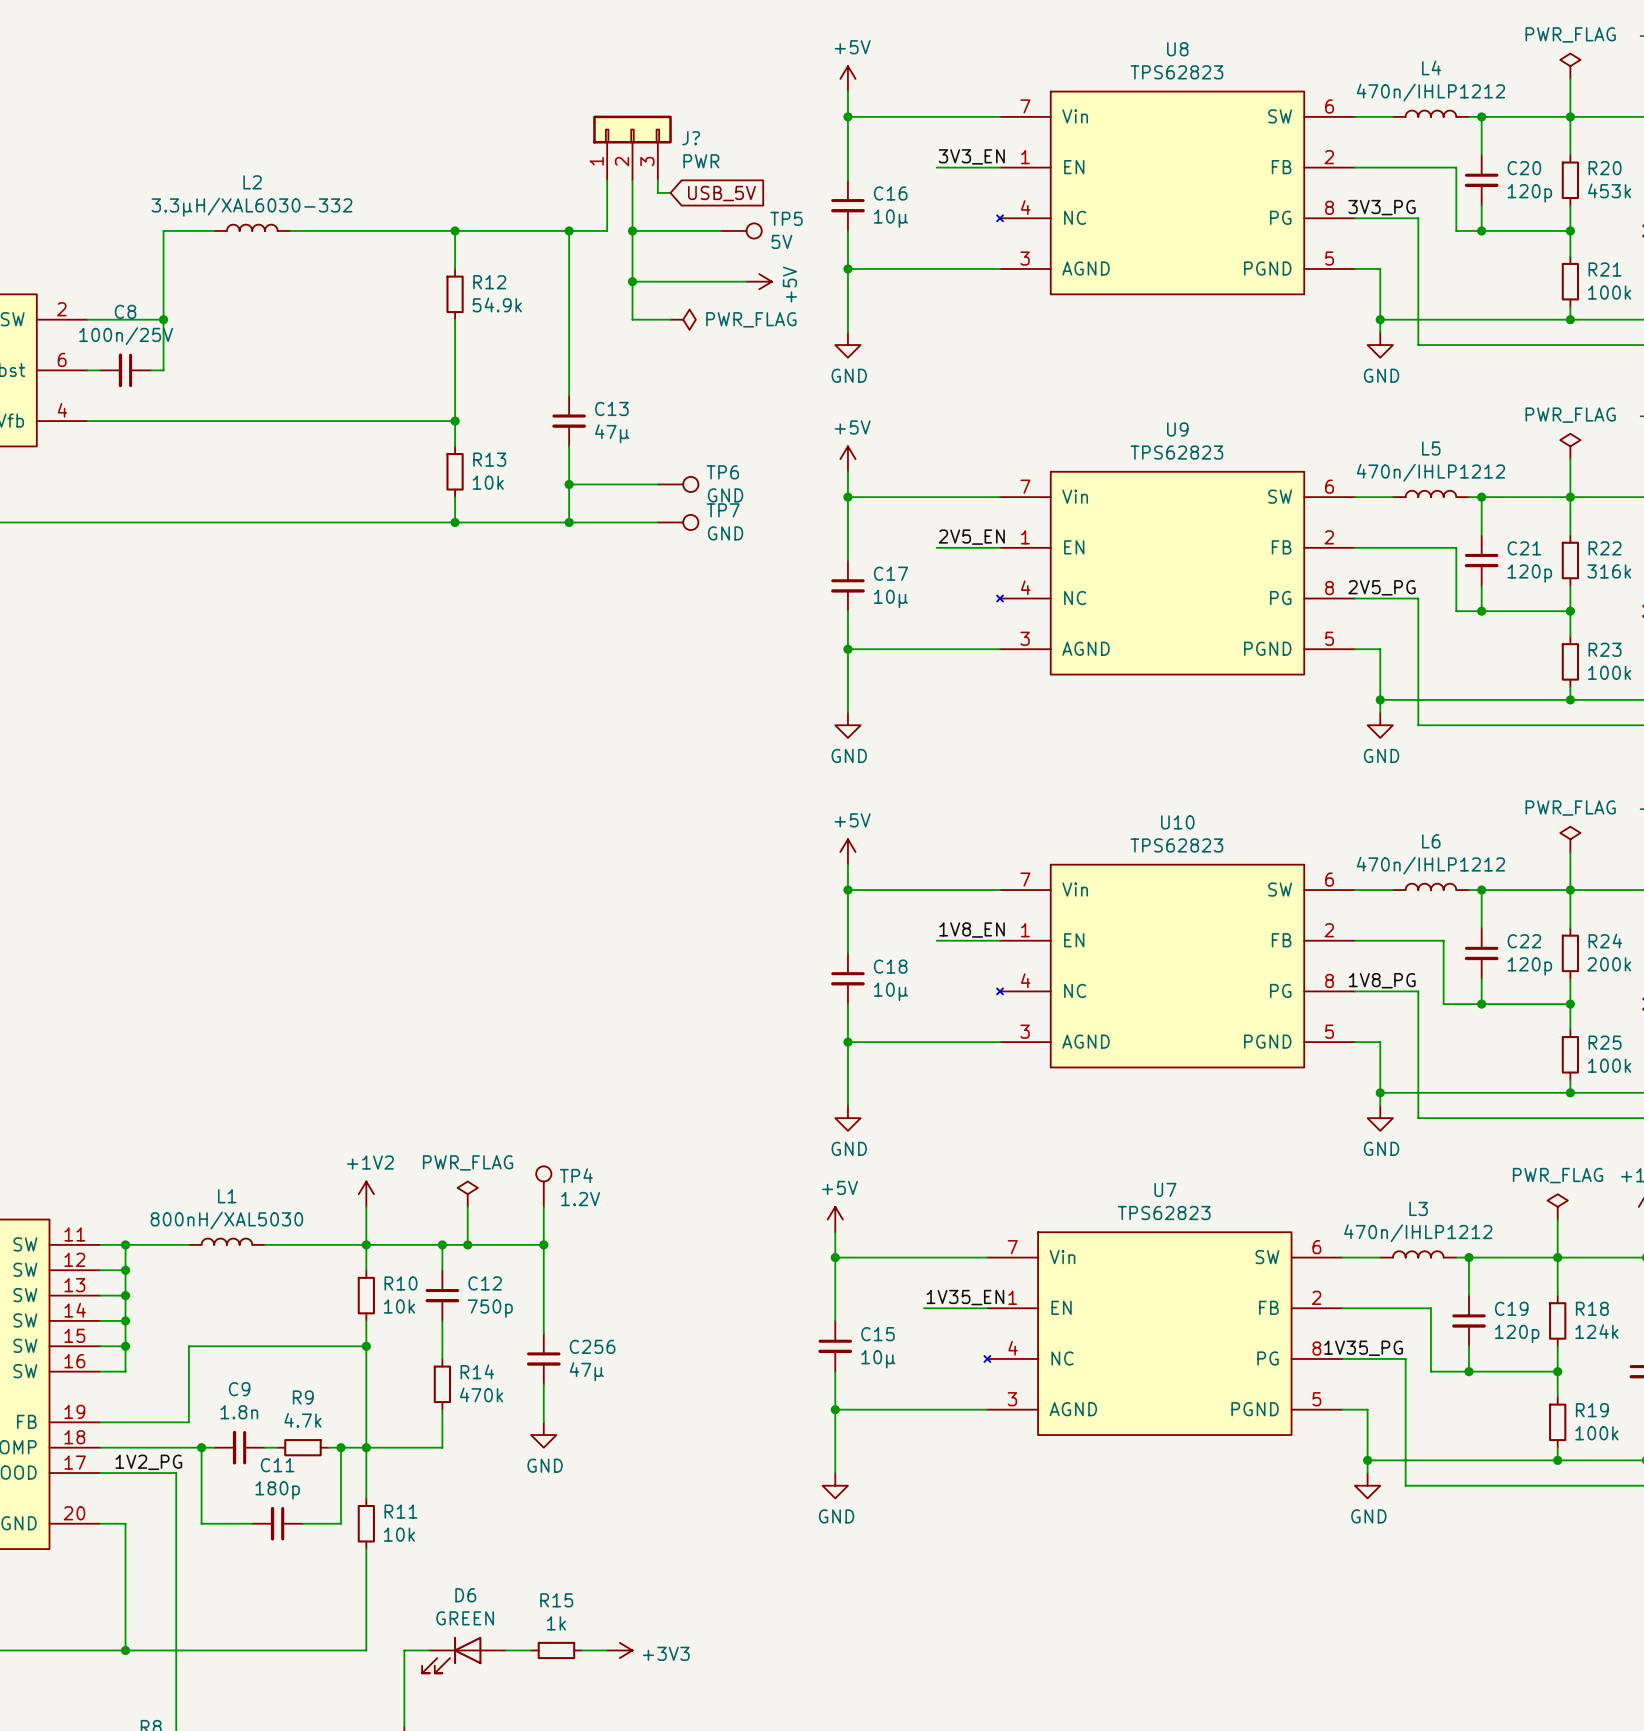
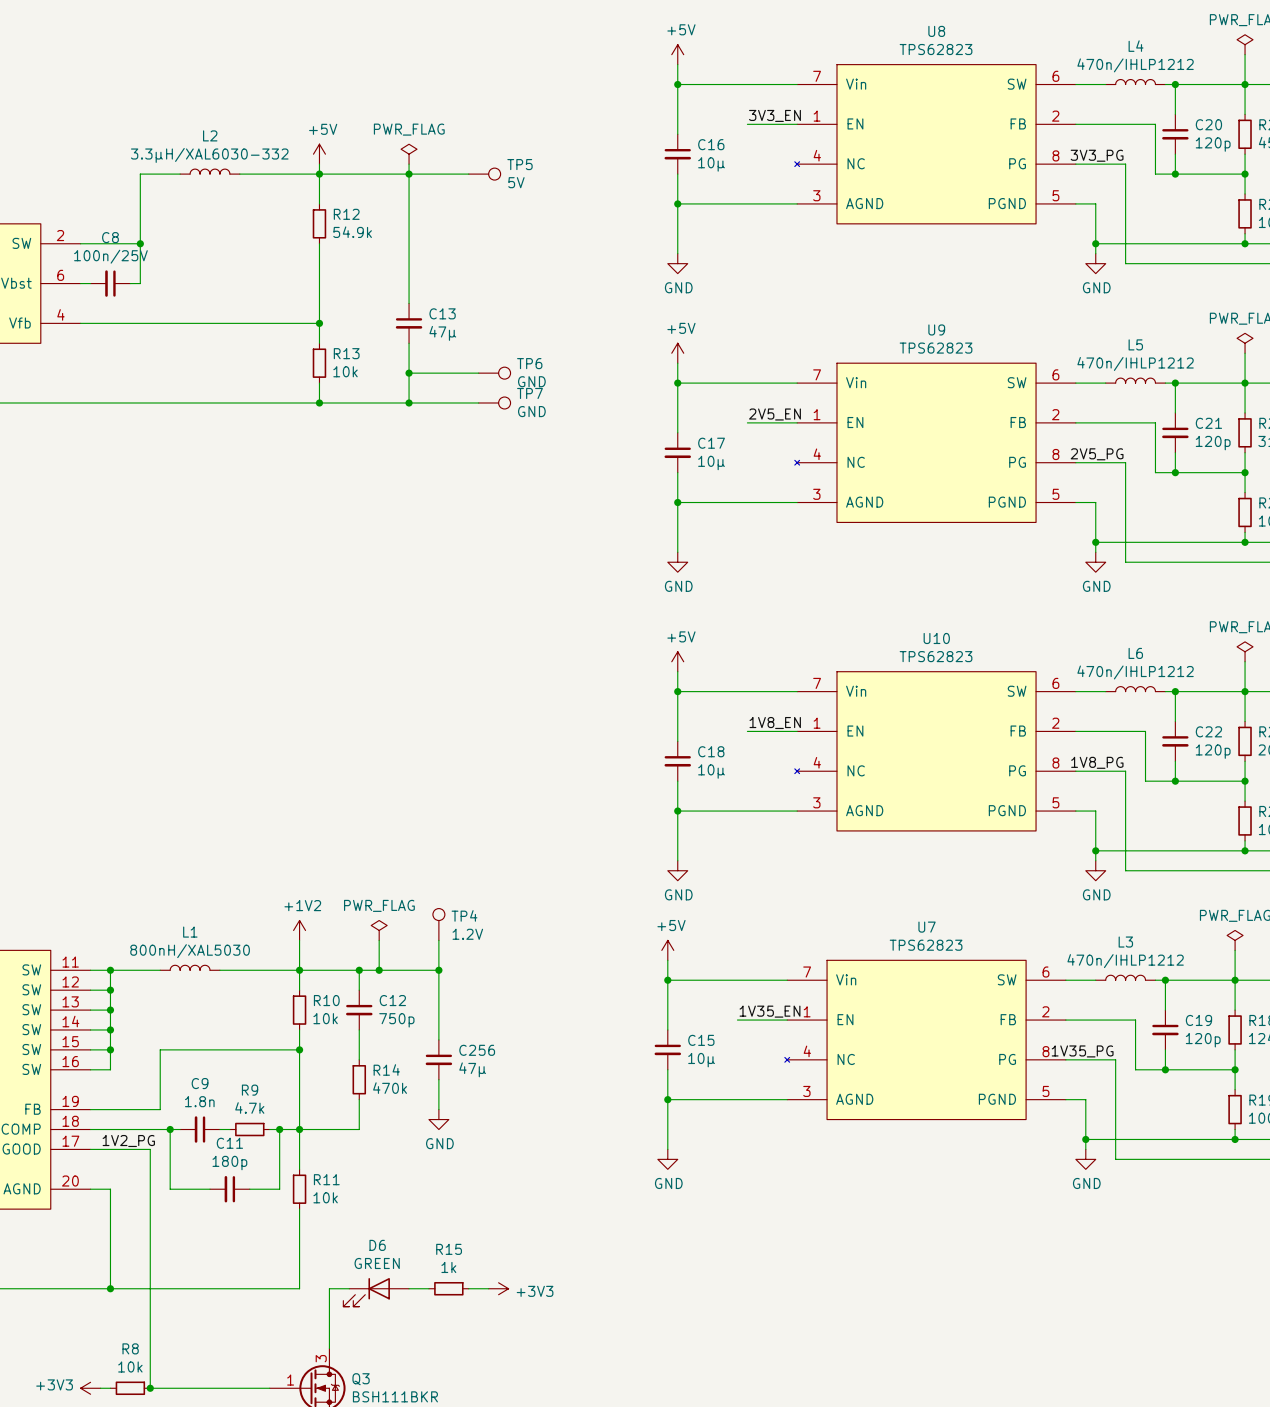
J?: PWR (632, 147) -> none
wire: (607, 180) (607, 230) (581, 230) -> none
wire: (632, 180) (632, 319) (670, 319) -> none
wire: (657, 180) (657, 192) (670, 192) -> none
global label: USB_5V (721, 193) -> none
power symbol: none -> +5V (319, 154)
wire: none -> (319, 164) (319, 203)
wire: none -> (409, 164) (409, 303)
junction: none -> (319, 174)
wire: (455, 230) (455, 269) -> none
junction: (455, 230) -> none
junction: none -> (409, 174)
wire: (569, 230) (569, 395) -> none
junction: (569, 230) -> none
wire: (632, 230) (721, 230) -> none
junction: (632, 230) -> none
TP5 position: (741, 230) -> (484, 174)
wire: (632, 281) (746, 281) -> none
junction: (632, 281) -> none
power symbol: +5V (759, 281) -> none
R12 position: (455, 294) -> (319, 223)
wire: (455, 319) (455, 446) -> (319, 243) (319, 343)
power symbol rotation: 0° (683, 319) -> 90° counterclockwise (409, 154)
power symbol position: PWR_FLAG (683, 319) -> PWR_FLAG (409, 154)
power symbol text position: PWR_FLAG (751, 319) -> PWR_FLAG (409, 129)
wire: (391, 421) (455, 421) -> none
junction: none -> (319, 323)
junction: (455, 421) -> none
C13 position: (569, 421) -> (409, 323)
wire: (569, 446) (569, 522) -> (409, 343) (409, 402)
R13 position: (455, 471) -> (319, 363)
junction: none -> (409, 373)
junction: (569, 484) -> none
wire: (594, 484) (657, 484) -> (409, 373) (458, 373)
TP6 position: (678, 484) -> (494, 373)
wire: (455, 497) (455, 522) -> (319, 383) (319, 402)
junction: none -> (319, 402)
junction: (455, 522) -> none
junction: none -> (409, 402)
junction: (569, 522) -> none
wire: (594, 522) (657, 522) -> none
TP7 position: (678, 522) -> (494, 402)

